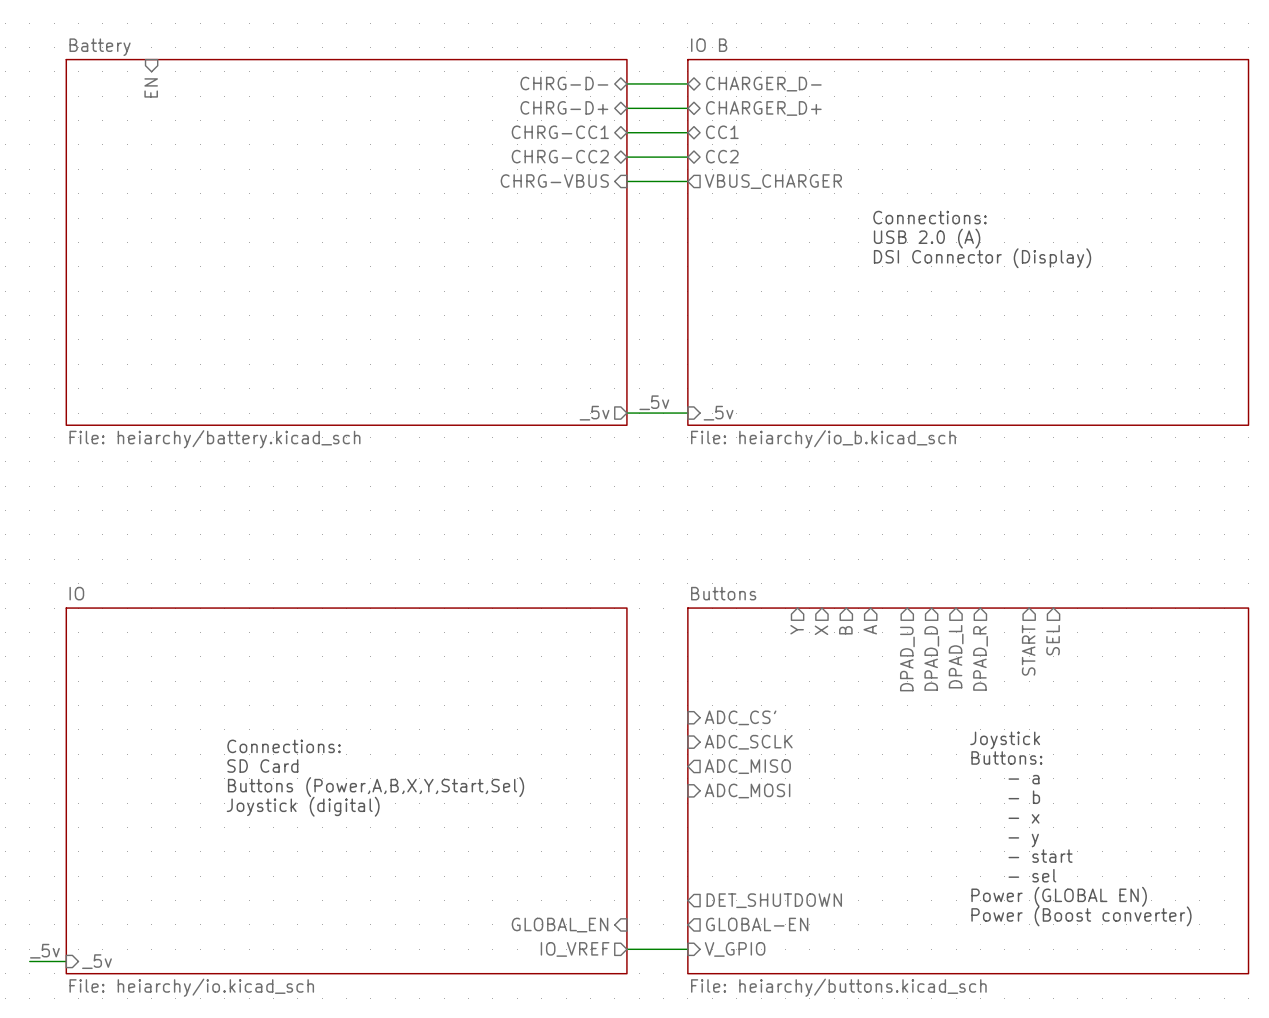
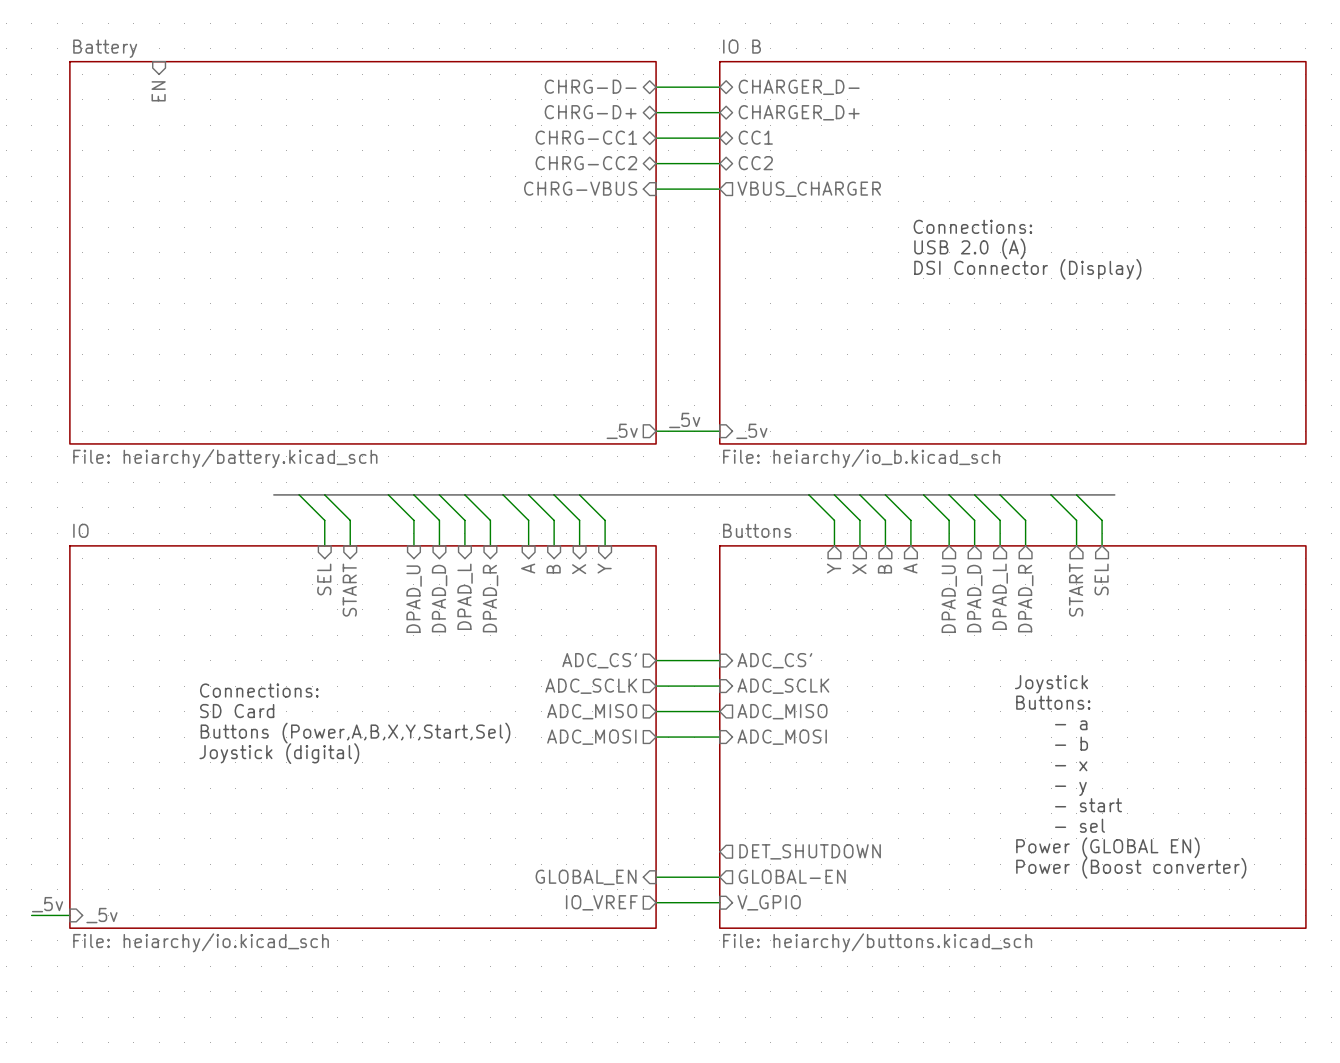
bus: none -> (273, 494) (1114, 494)
wire: none -> (299, 494) (324, 520) (324, 545)
wire: none -> (324, 494) (350, 520) (350, 545)
wire: none -> (388, 494) (413, 520) (413, 545)
wire: none -> (413, 494) (439, 520) (439, 545)
wire: none -> (439, 494) (464, 520) (464, 545)
wire: none -> (464, 494) (490, 520) (490, 545)
wire: none -> (503, 494) (528, 520) (528, 545)
wire: none -> (528, 494) (554, 520) (554, 545)
wire: none -> (554, 494) (579, 520) (579, 545)
wire: none -> (579, 494) (605, 520) (605, 545)
wire: none -> (808, 494) (834, 520) (834, 545)
wire: none -> (834, 494) (859, 520) (859, 545)
wire: none -> (859, 494) (885, 520) (885, 545)
wire: none -> (885, 494) (910, 520) (910, 545)
wire: none -> (923, 494) (949, 520) (949, 545)
wire: none -> (949, 494) (974, 520) (974, 545)
wire: none -> (974, 494) (1000, 520) (1000, 545)
wire: none -> (1000, 494) (1025, 520) (1025, 545)
wire: none -> (1051, 494) (1076, 520) (1076, 545)
wire: none -> (1076, 494) (1102, 520) (1102, 545)
sheet pin: none -> A (528, 568)
sheet pin: none -> B (553, 569)
sheet pin: none -> X (579, 569)
sheet pin: none -> Y (604, 568)
sheet pin: none -> SEL (324, 579)
sheet pin: none -> START (349, 590)
sheet pin: none -> DPAD_L (465, 596)
sheet pin: none -> DPAD_U (414, 599)
sheet pin: none -> DPAD_D (439, 598)
sheet pin: none -> DPAD_R (490, 598)
sheet pin position: Y (797, 629) -> Y (833, 568)
sheet pin position: A (870, 629) -> A (910, 568)
sheet pin position: X (821, 630) -> X (859, 569)
sheet pin position: B (845, 630) -> B (884, 569)
sheet pin: none -> ADC_CS' (599, 660)
wire: none -> (656, 660) (719, 660)
sheet pin: none -> ADC_CS' (774, 660)
sheet pin position: SEL (1053, 640) -> SEL (1101, 579)
sheet pin position: START (1028, 650) -> START (1076, 590)
sheet pin: none -> ADC_SCLK (591, 686)
wire: none -> (656, 686) (719, 686)
sheet pin: none -> ADC_SCLK (783, 686)
sheet pin position: DPAD_L (956, 656) -> DPAD_L (1000, 596)
sheet pin position: DPAD_D (931, 658) -> DPAD_D (974, 598)
sheet pin position: DPAD_R (980, 658) -> DPAD_R (1025, 598)
sheet pin position: DPAD_U (907, 659) -> DPAD_U (949, 599)
sheet pin: none -> ADC_MISO (592, 711)
wire: none -> (656, 711) (719, 711)
sheet pin: none -> ADC_MISO (782, 711)
sheet pin: none -> ADC_MOSI (591, 737)
wire: none -> (656, 737) (719, 737)
sheet pin: ADC_CS' (740, 717) -> ADC_MOSI (782, 737)
text position: Joystick (1005, 740) -> Joystick (1051, 684)
sheet pin: ADC_SCLK (748, 742) -> none
text position: Connections: (284, 746) -> Connections: (259, 690)
text position: Buttons: (1006, 757) -> Buttons: (1053, 702)
text position: SD Card (262, 766) -> SD Card (237, 711)
sheet pin: ADC_MISO (747, 766) -> none
text position: - a (1024, 779) -> - a (1071, 725)
text position: Buttons (Power,A,B,X,Y,Start,Sel) (376, 787) -> Buttons (Power,A,B,X,Y,Start,Sel) (355, 733)
sheet IO position: (346, 790) -> (362, 737)
sheet pin: ADC_MOSI (747, 790) -> none
sheet Buttons position: (968, 790) -> (1012, 737)
text position: - b (1024, 797) -> - b (1071, 743)
text position: Joystick (digital) (303, 806) -> Joystick (digital) (279, 753)
text position: - x (1024, 818) -> - x (1071, 766)
wire: none -> (656, 877) (719, 877)
text position: - y (1023, 840) -> - y (1070, 788)
text position: - start (1040, 856) -> - start (1088, 805)
text position: - sel (1032, 875) -> - sel (1080, 825)
text position: Power (GLOBAL EN) (1059, 896) -> Power (GLOBAL EN) (1107, 847)
sheet pin position: DET_SHUTDOWN (774, 900) -> DET_SHUTDOWN (810, 851)
text position: Power (Boost converter) (1081, 916) -> Power (Boost converter) (1131, 868)
sheet pin position: GLOBAL-EN (757, 924) -> GLOBAL-EN (792, 876)
sheet pin position: GLOBAL_EN (560, 925) -> GLOBAL_EN (586, 877)
sheet pin position: IO_VREF (575, 949) -> IO_VREF (601, 902)
wire: (626, 949) (687, 949) -> (656, 902) (719, 902)
sheet pin position: V_GPIO (735, 949) -> V_GPIO (769, 902)
label position: _5v (44, 951) -> _5v (47, 904)
wire: (29, 961) (66, 961) -> (31, 915) (69, 915)
sheet pin position: _5v (96, 961) -> _5v (101, 915)

